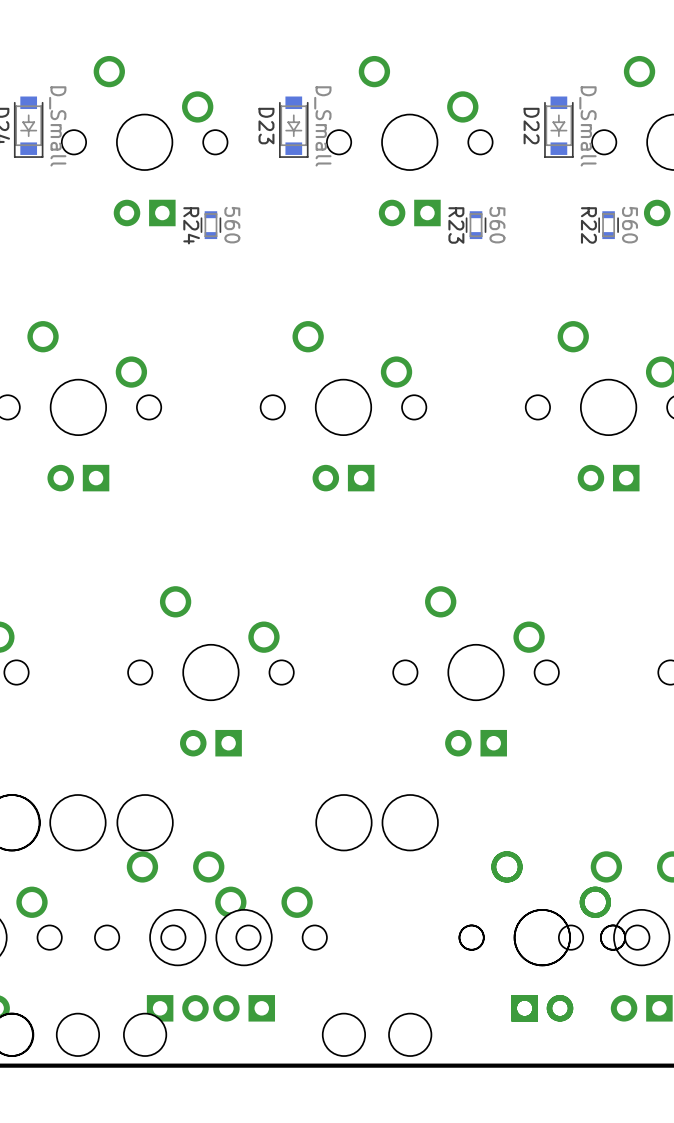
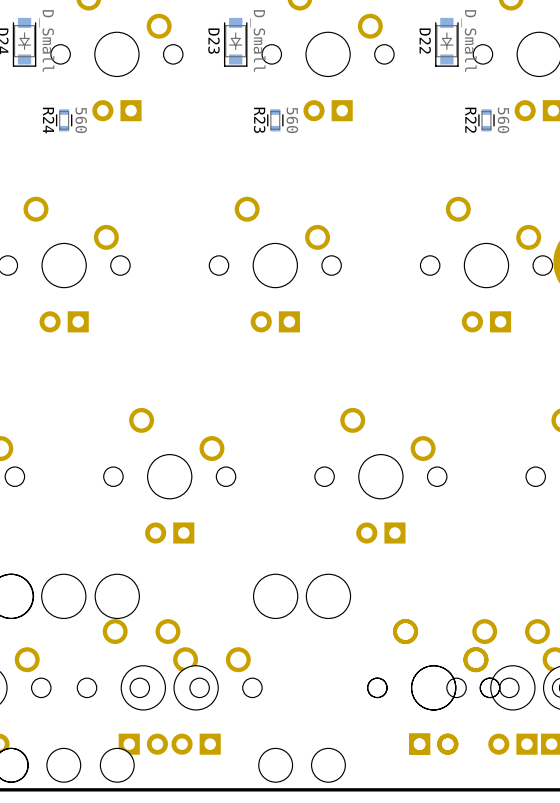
R24 position: (210, 225) -> (64, 120)
R23 position: (476, 225) -> (275, 120)

